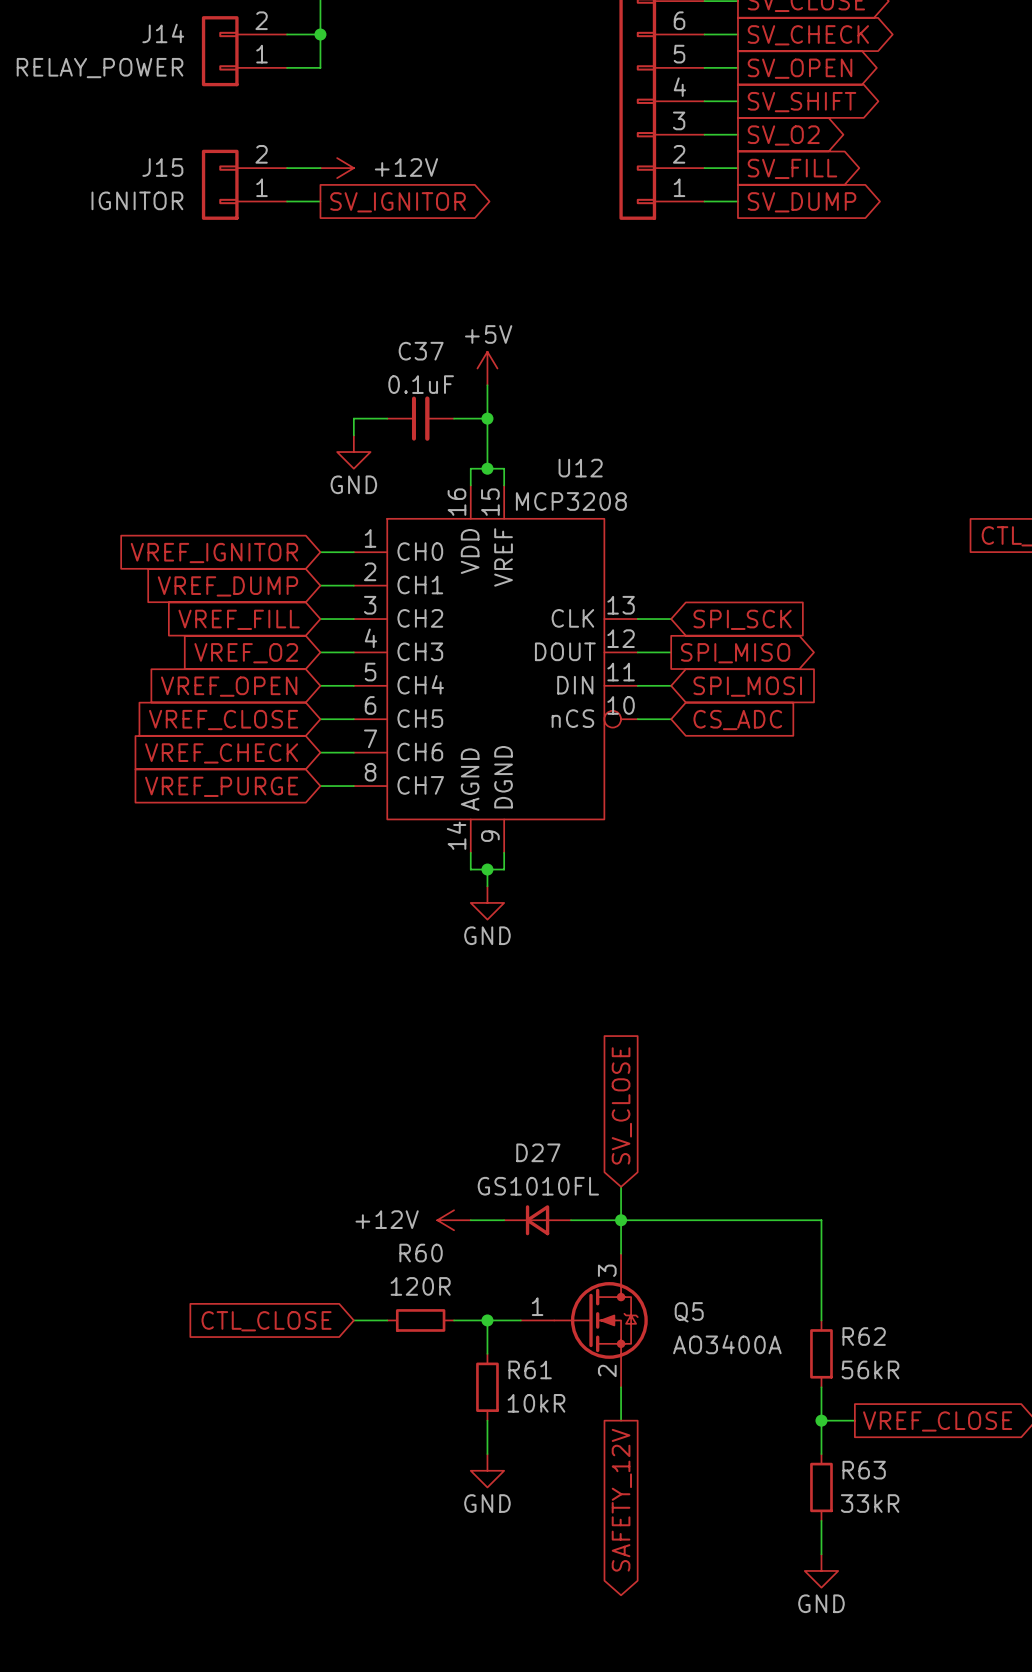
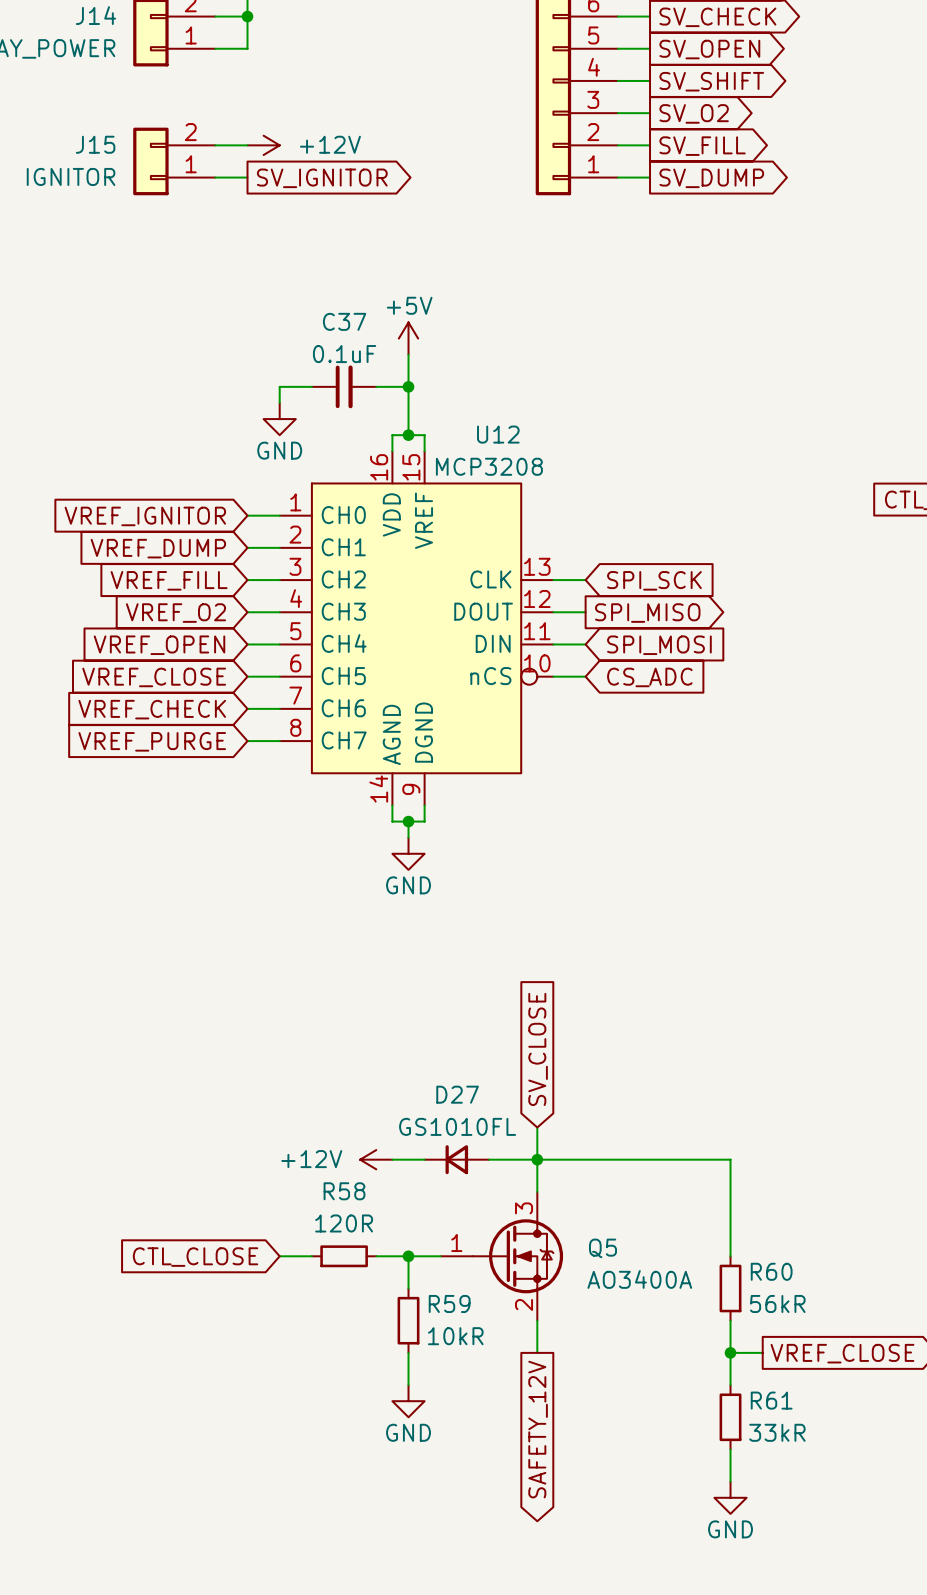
R60 name: R60 (421, 1253) -> R58 (344, 1191)
R62 name: R62 (864, 1336) -> R60 (771, 1271)
R61 name: R61 (530, 1369) -> R59 (449, 1303)
R63 name: R63 (864, 1470) -> R61 (771, 1400)

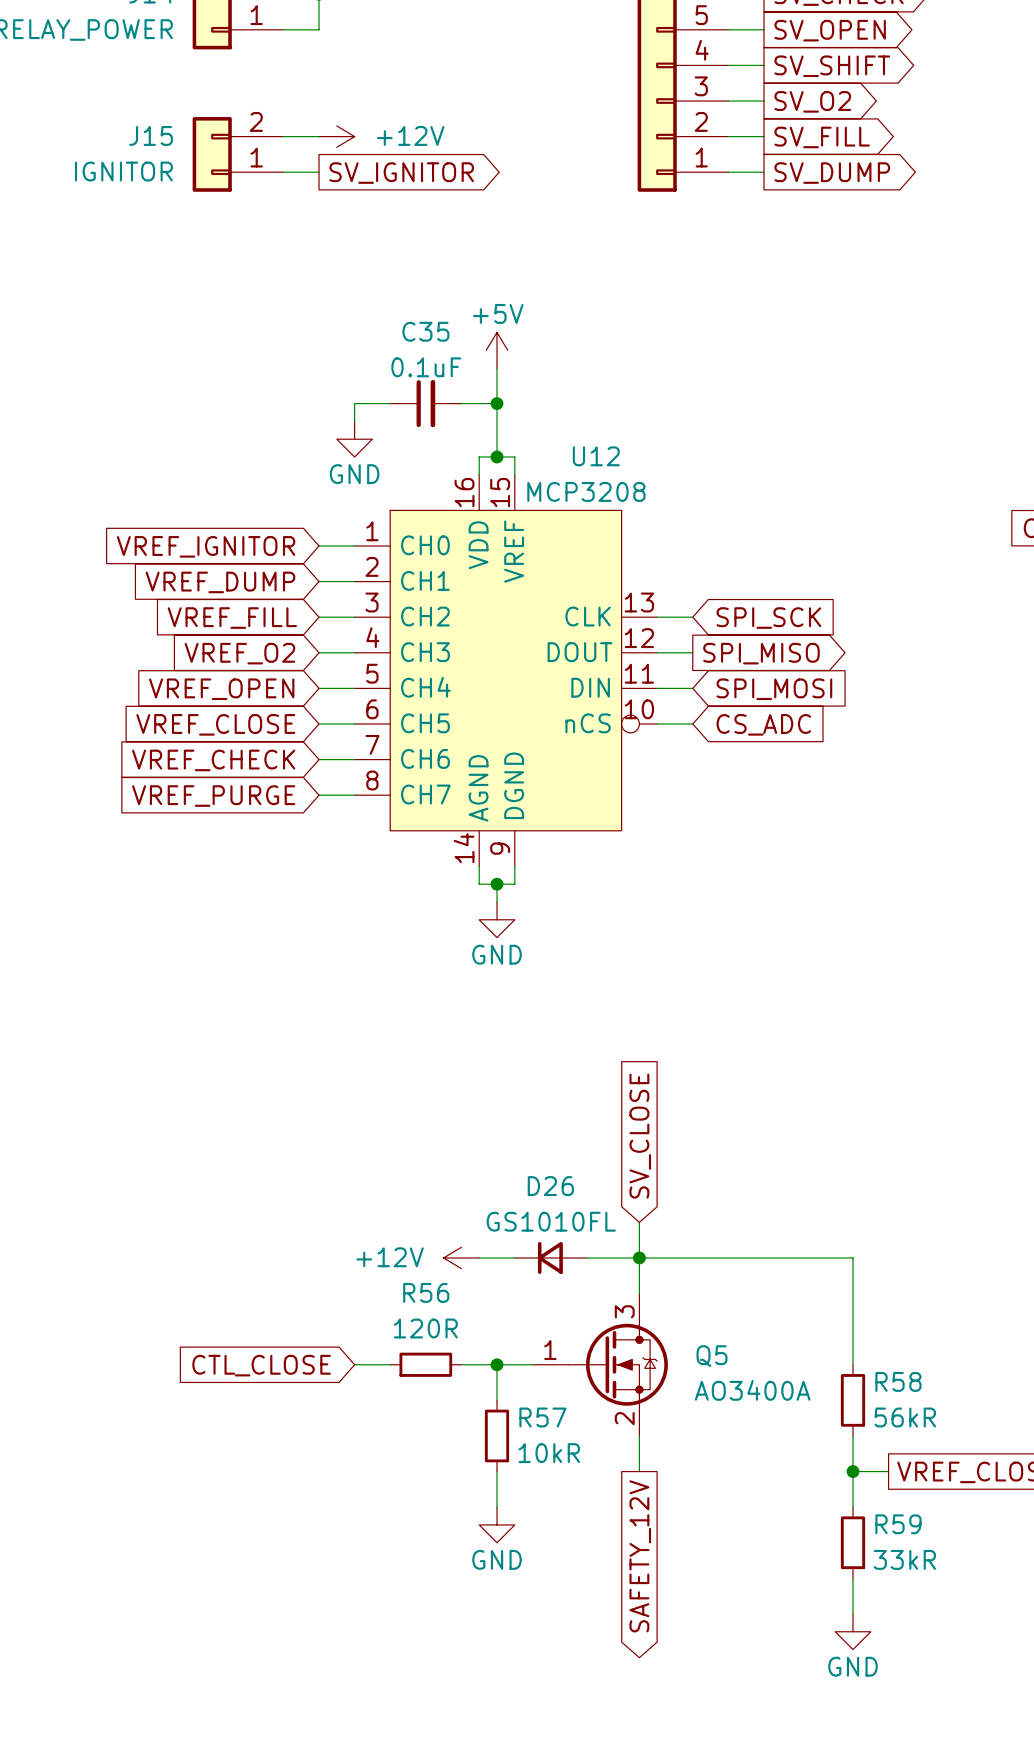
C37 name: C37 (344, 321) -> C35 (425, 331)
D27 name: D27 (457, 1094) -> D26 (550, 1186)
R58 name: R58 (344, 1191) -> R56 (426, 1292)
R60 name: R60 (771, 1271) -> R58 (898, 1381)
R59 name: R59 (449, 1303) -> R57 (542, 1417)
R61 name: R61 (771, 1400) -> R59 (898, 1524)

